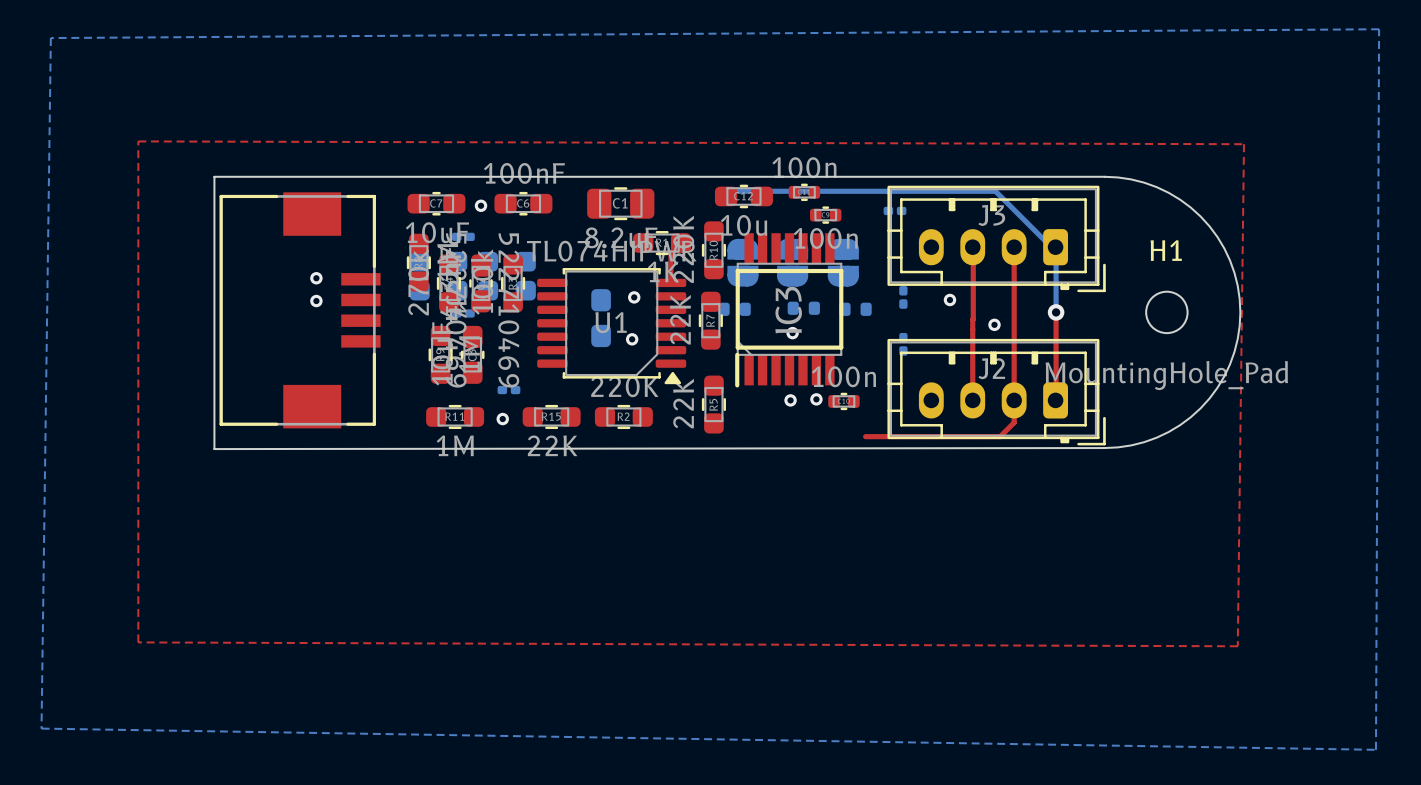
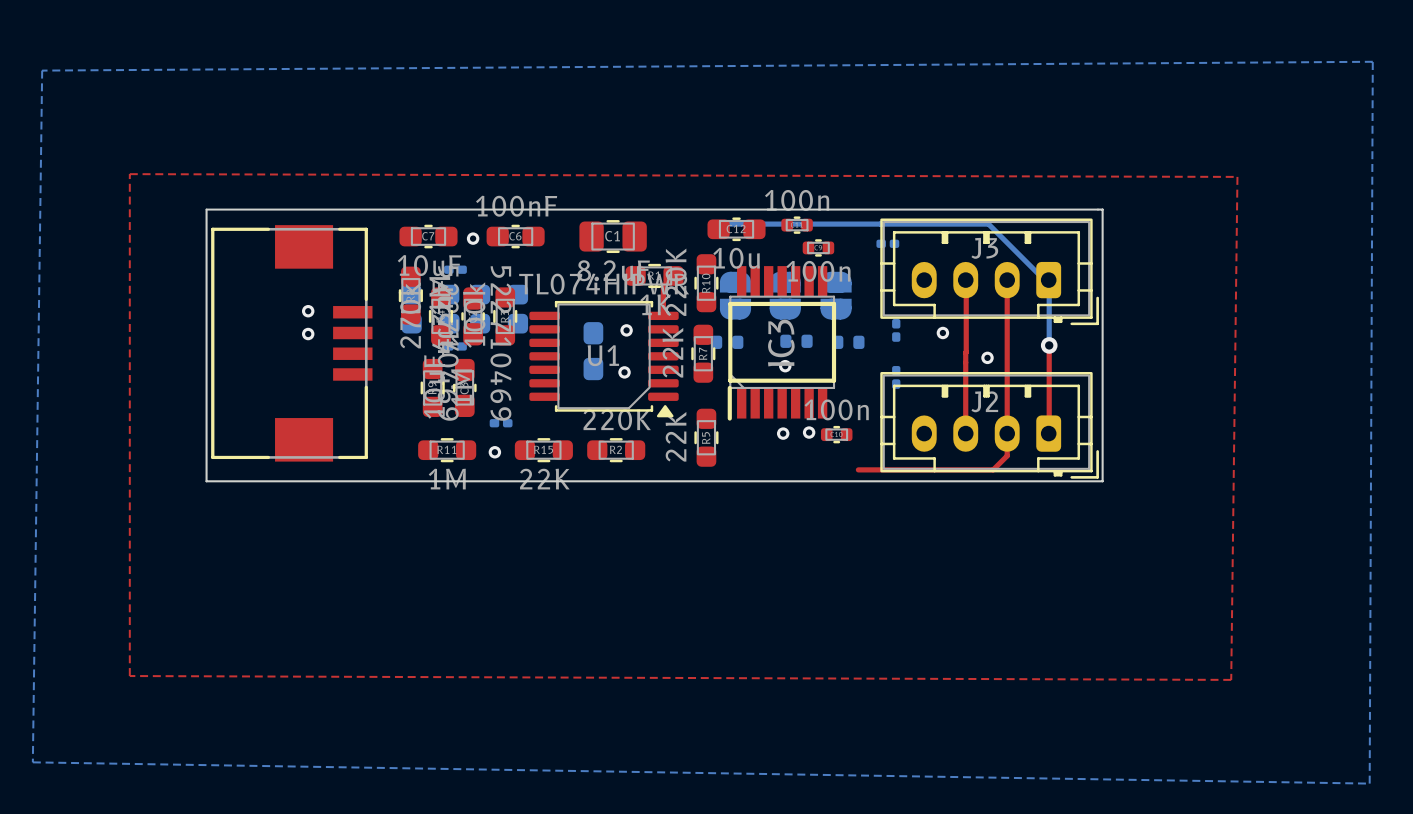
board edge: (214, 176) (214, 449) (1104, 448) (1144, 442) (1180, 425) (1200, 408) (1217, 387) (1234, 351) (1239, 325) (1239, 299) (1234, 273) (1224, 248) (1209, 226) (1190, 207) (1156, 187) (1131, 179) (1104, 176) -> (206, 209) (206, 481) (1102, 481) (1102, 209) (1097, 209)
H1: MountingHole_Pad (1166, 312) -> none

